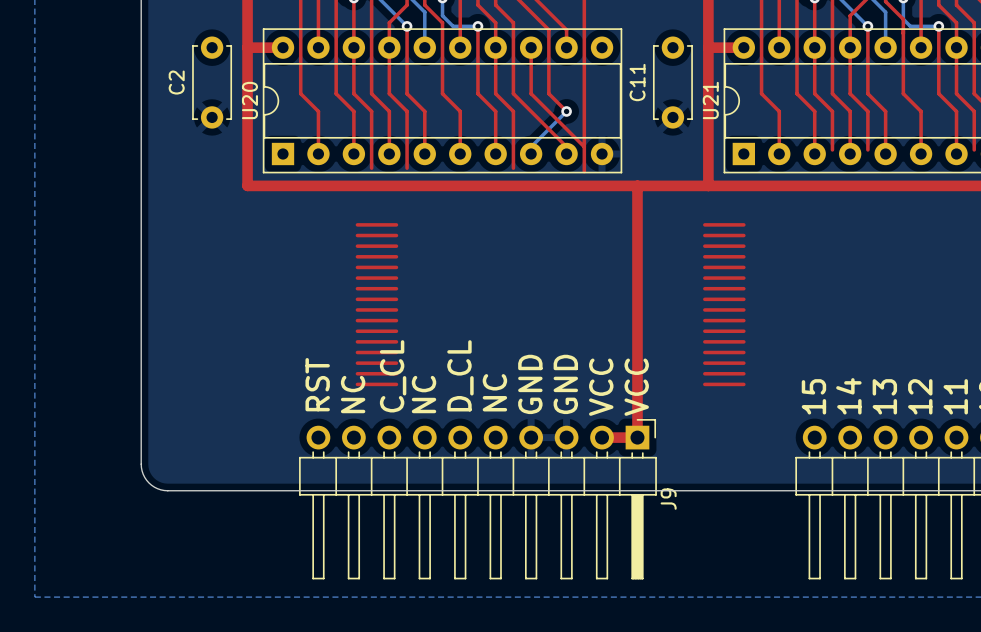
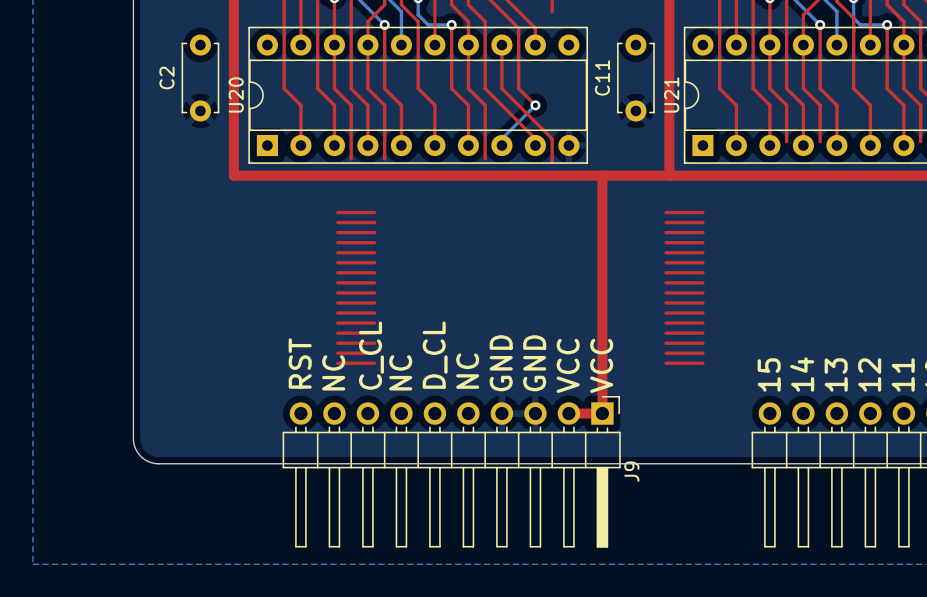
top track: (584, 12) (584, 146) -> none
top track: (247, 47) (283, 47) -> none
top track: (708, 47) (743, 47) -> none

